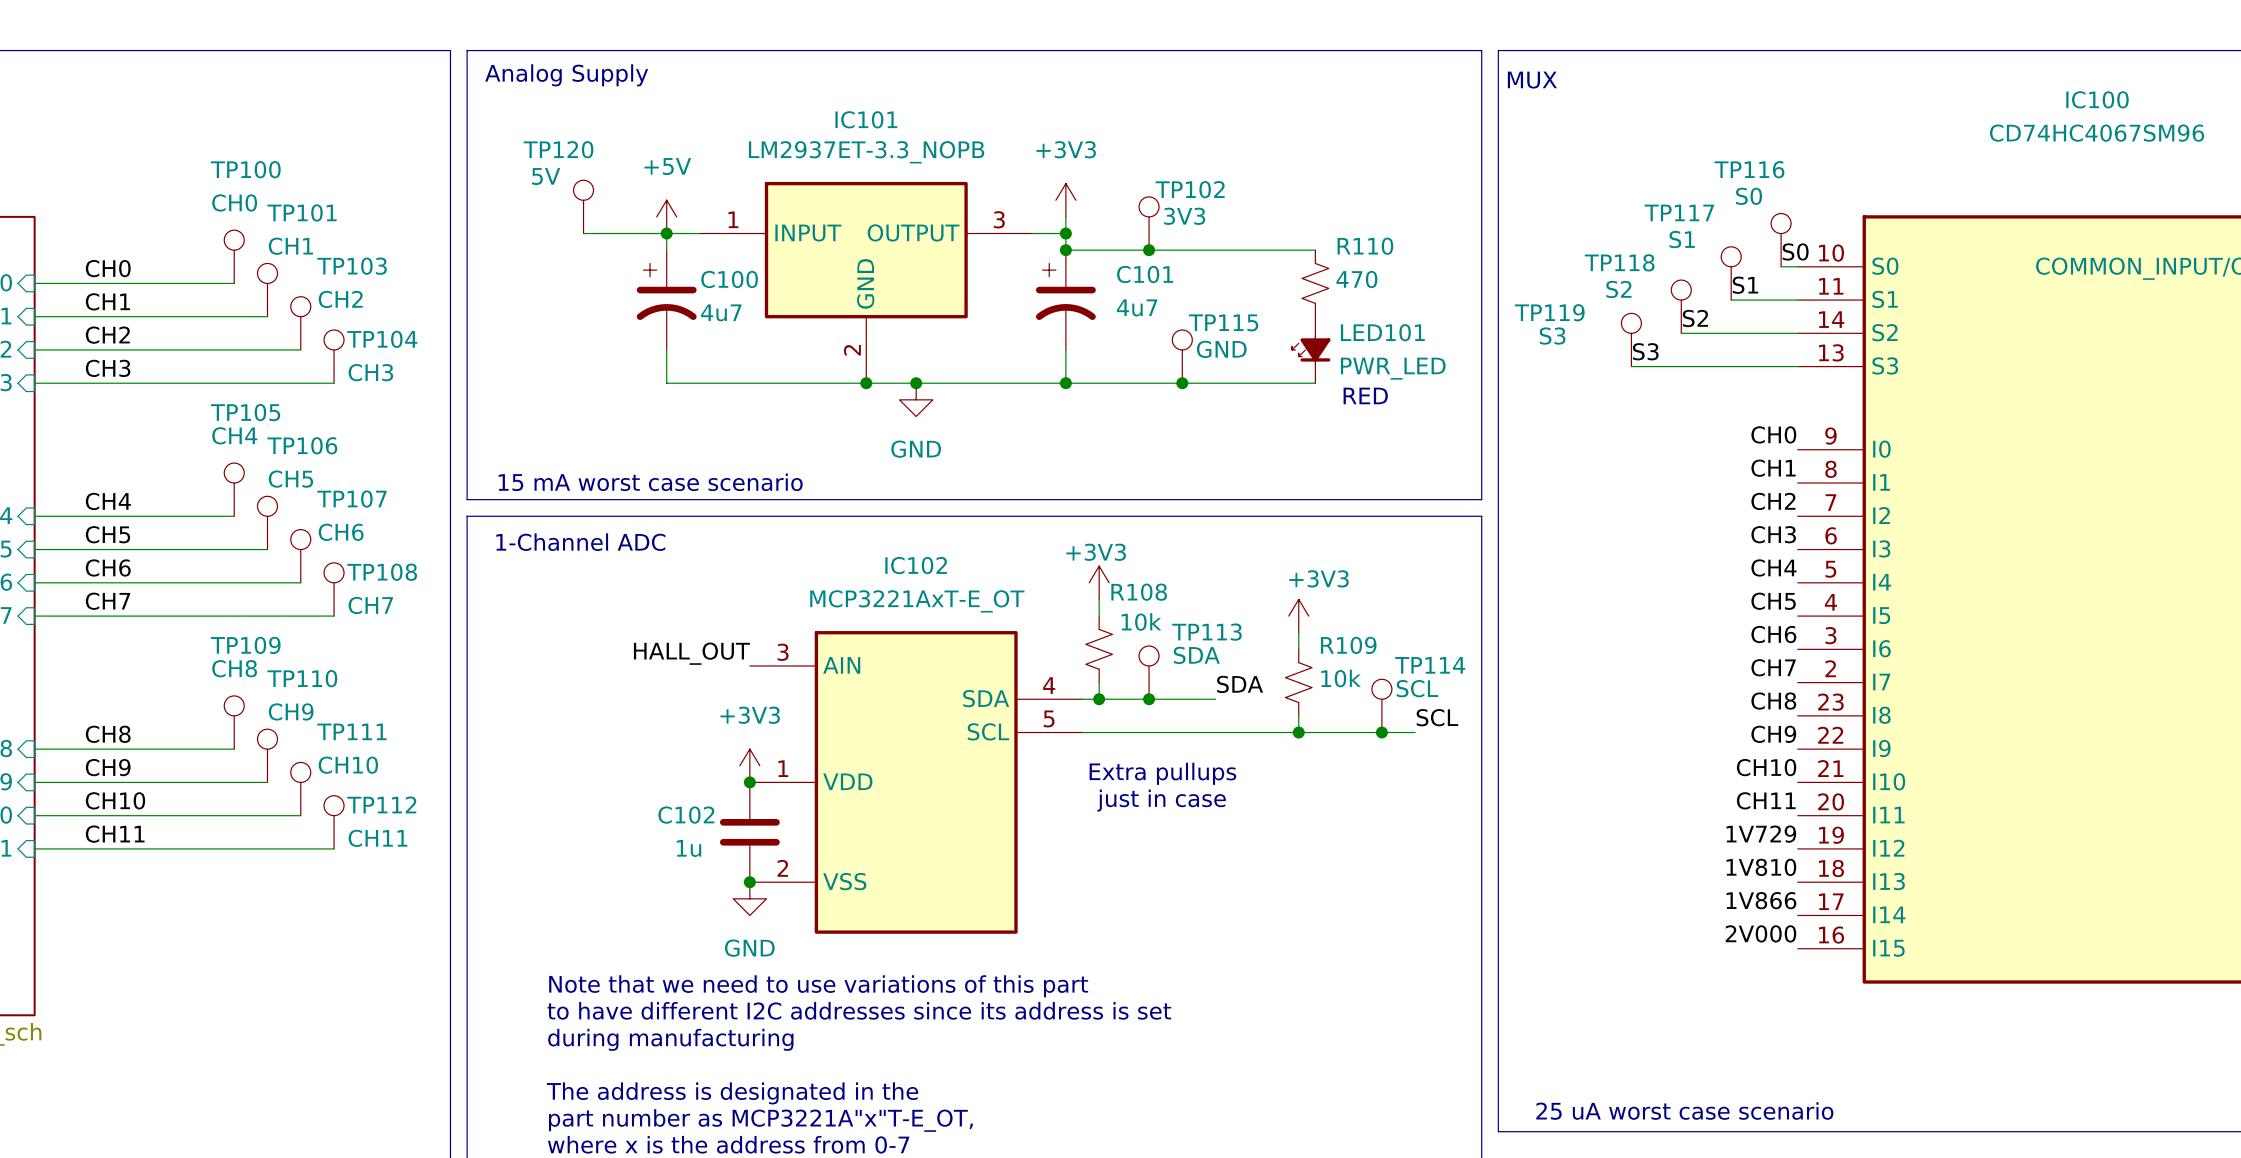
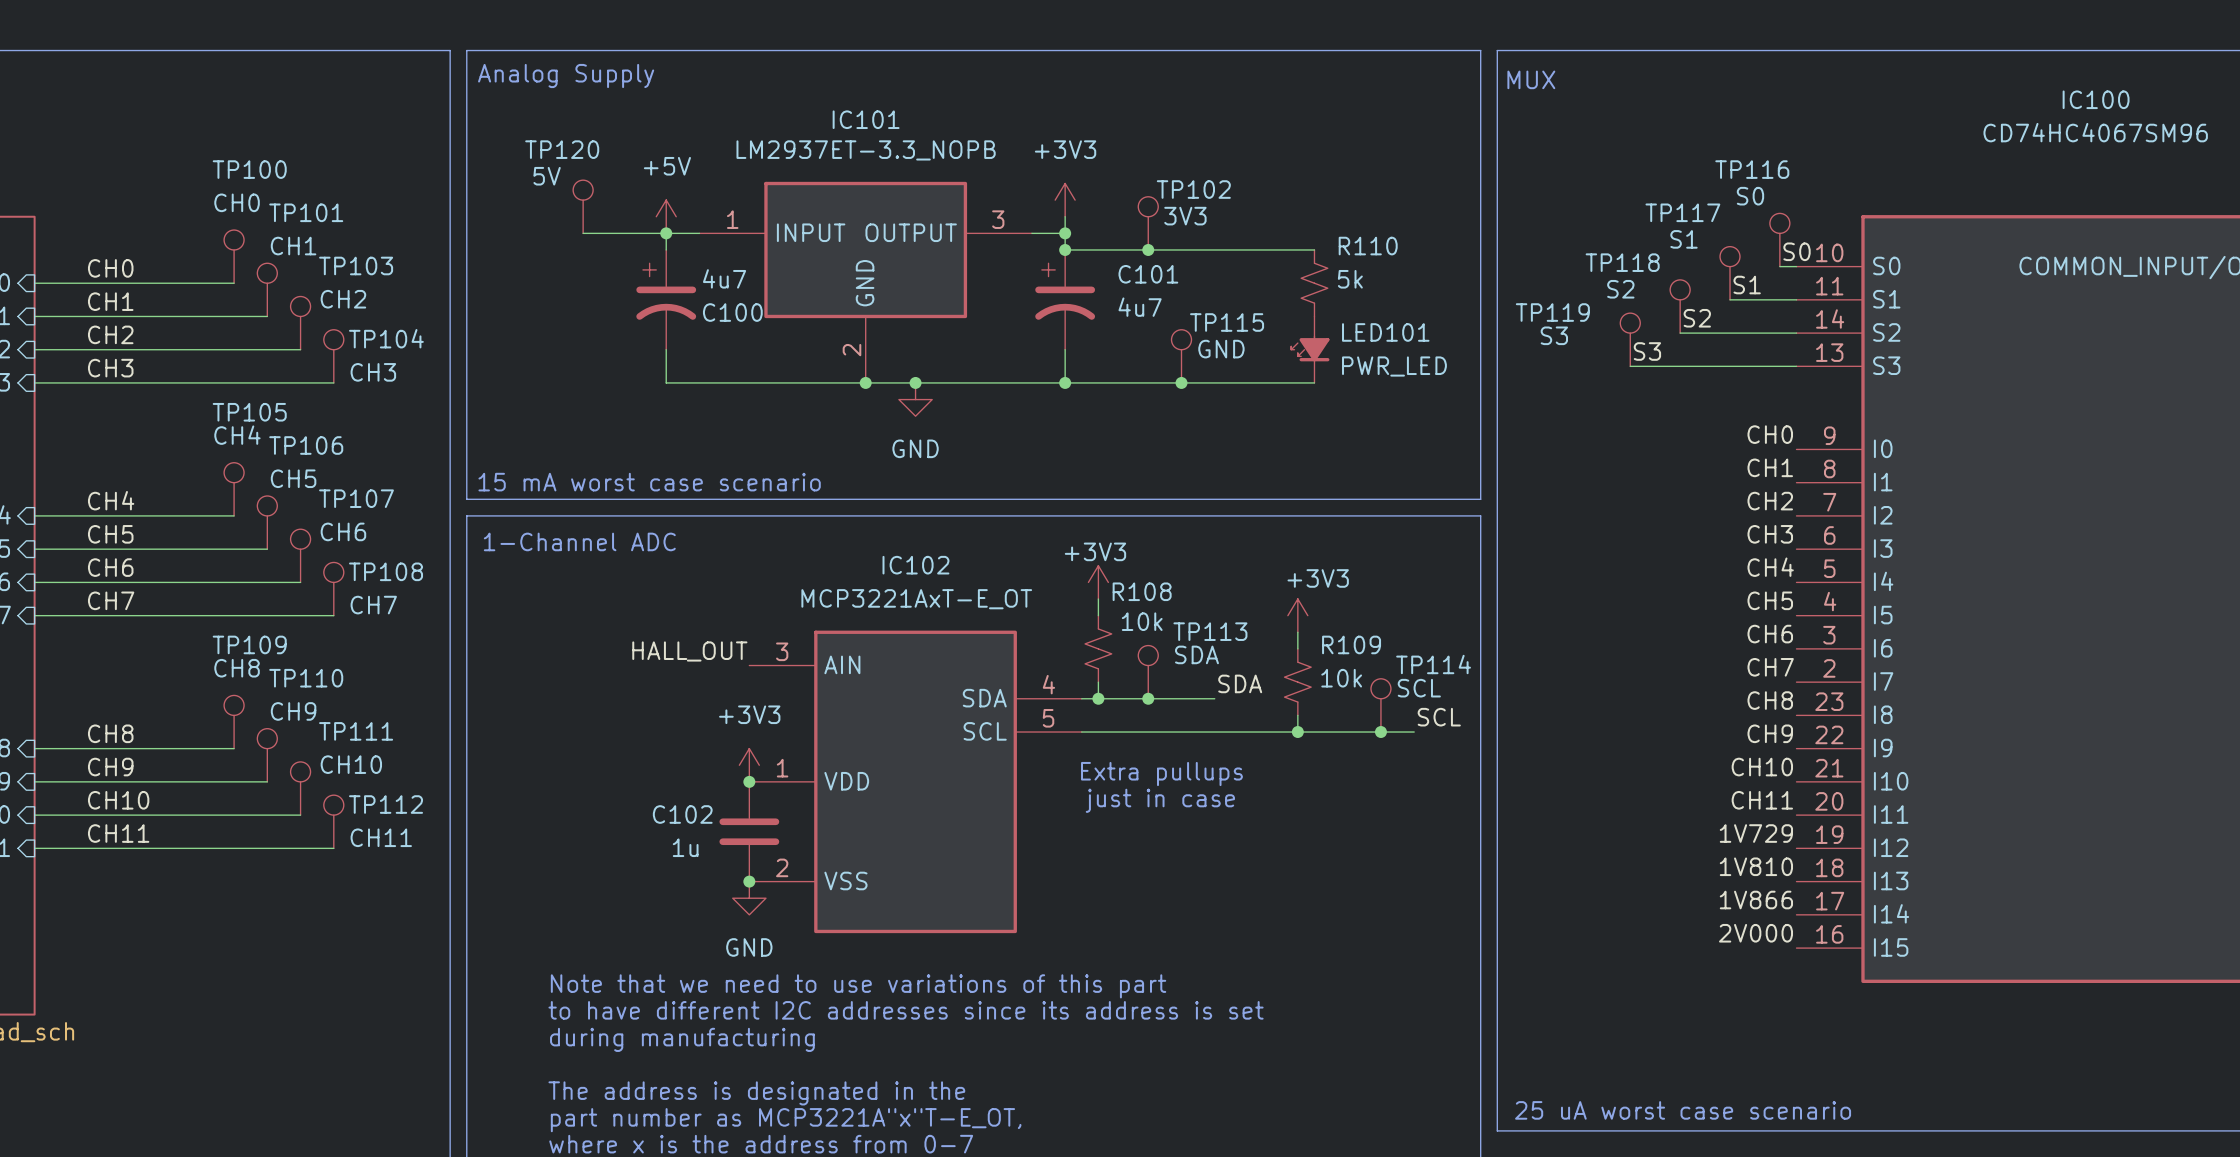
C100 name position: C100 (729, 279) -> C100 (732, 312)
R110 value: 470 (1356, 279) -> 5k (1350, 279)
C100 value position: 4u7 (721, 312) -> 4u7 (724, 278)
text: RED (1365, 395) -> none

